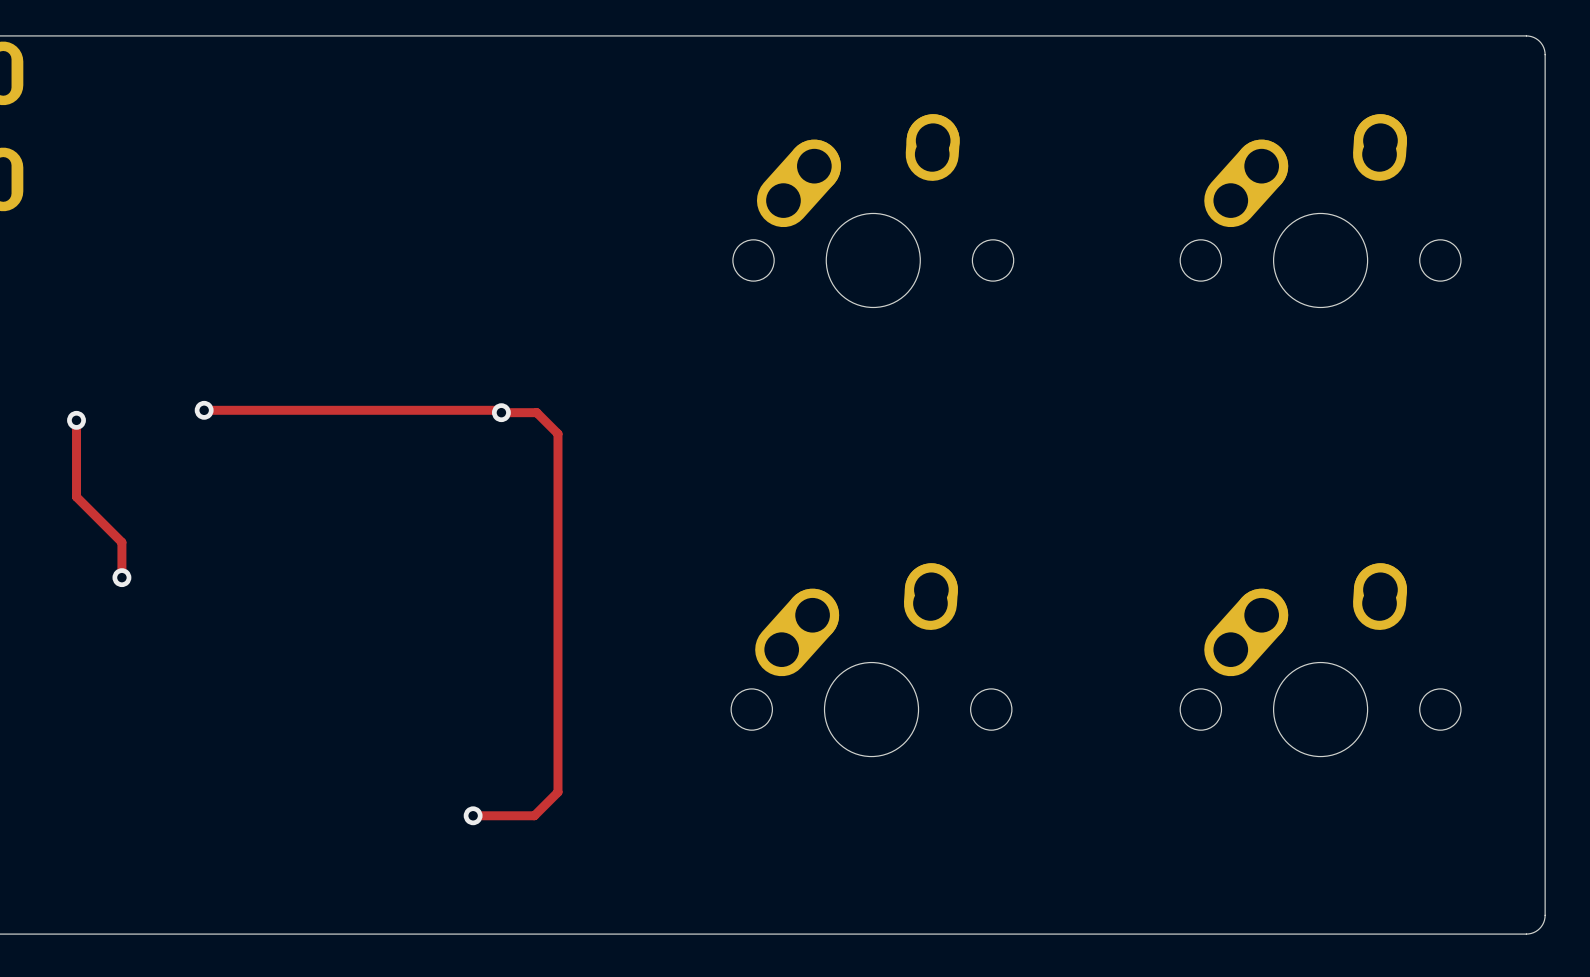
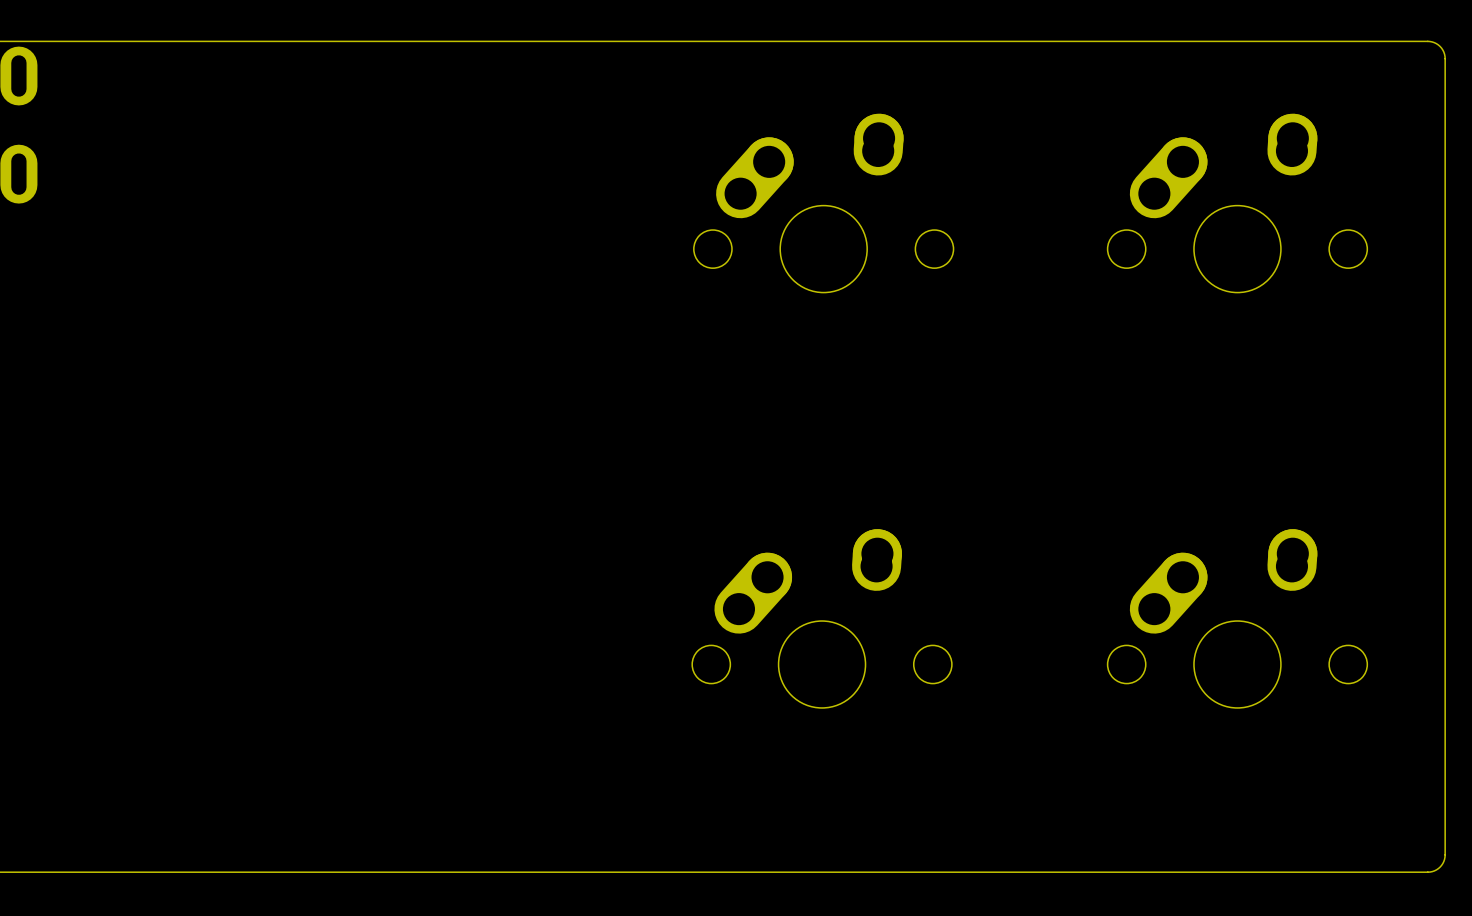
track: (204, 410) (499, 410) (501, 412) (536, 412) (557, 433) (557, 792) (534, 815) (473, 815) -> none
via: (204, 410) -> none
via: (501, 412) -> none
track: (76, 420) (76, 496) (121, 542) (121, 577) -> none
via: (76, 420) -> none
via: (121, 577) -> none
via: (473, 815) -> none

